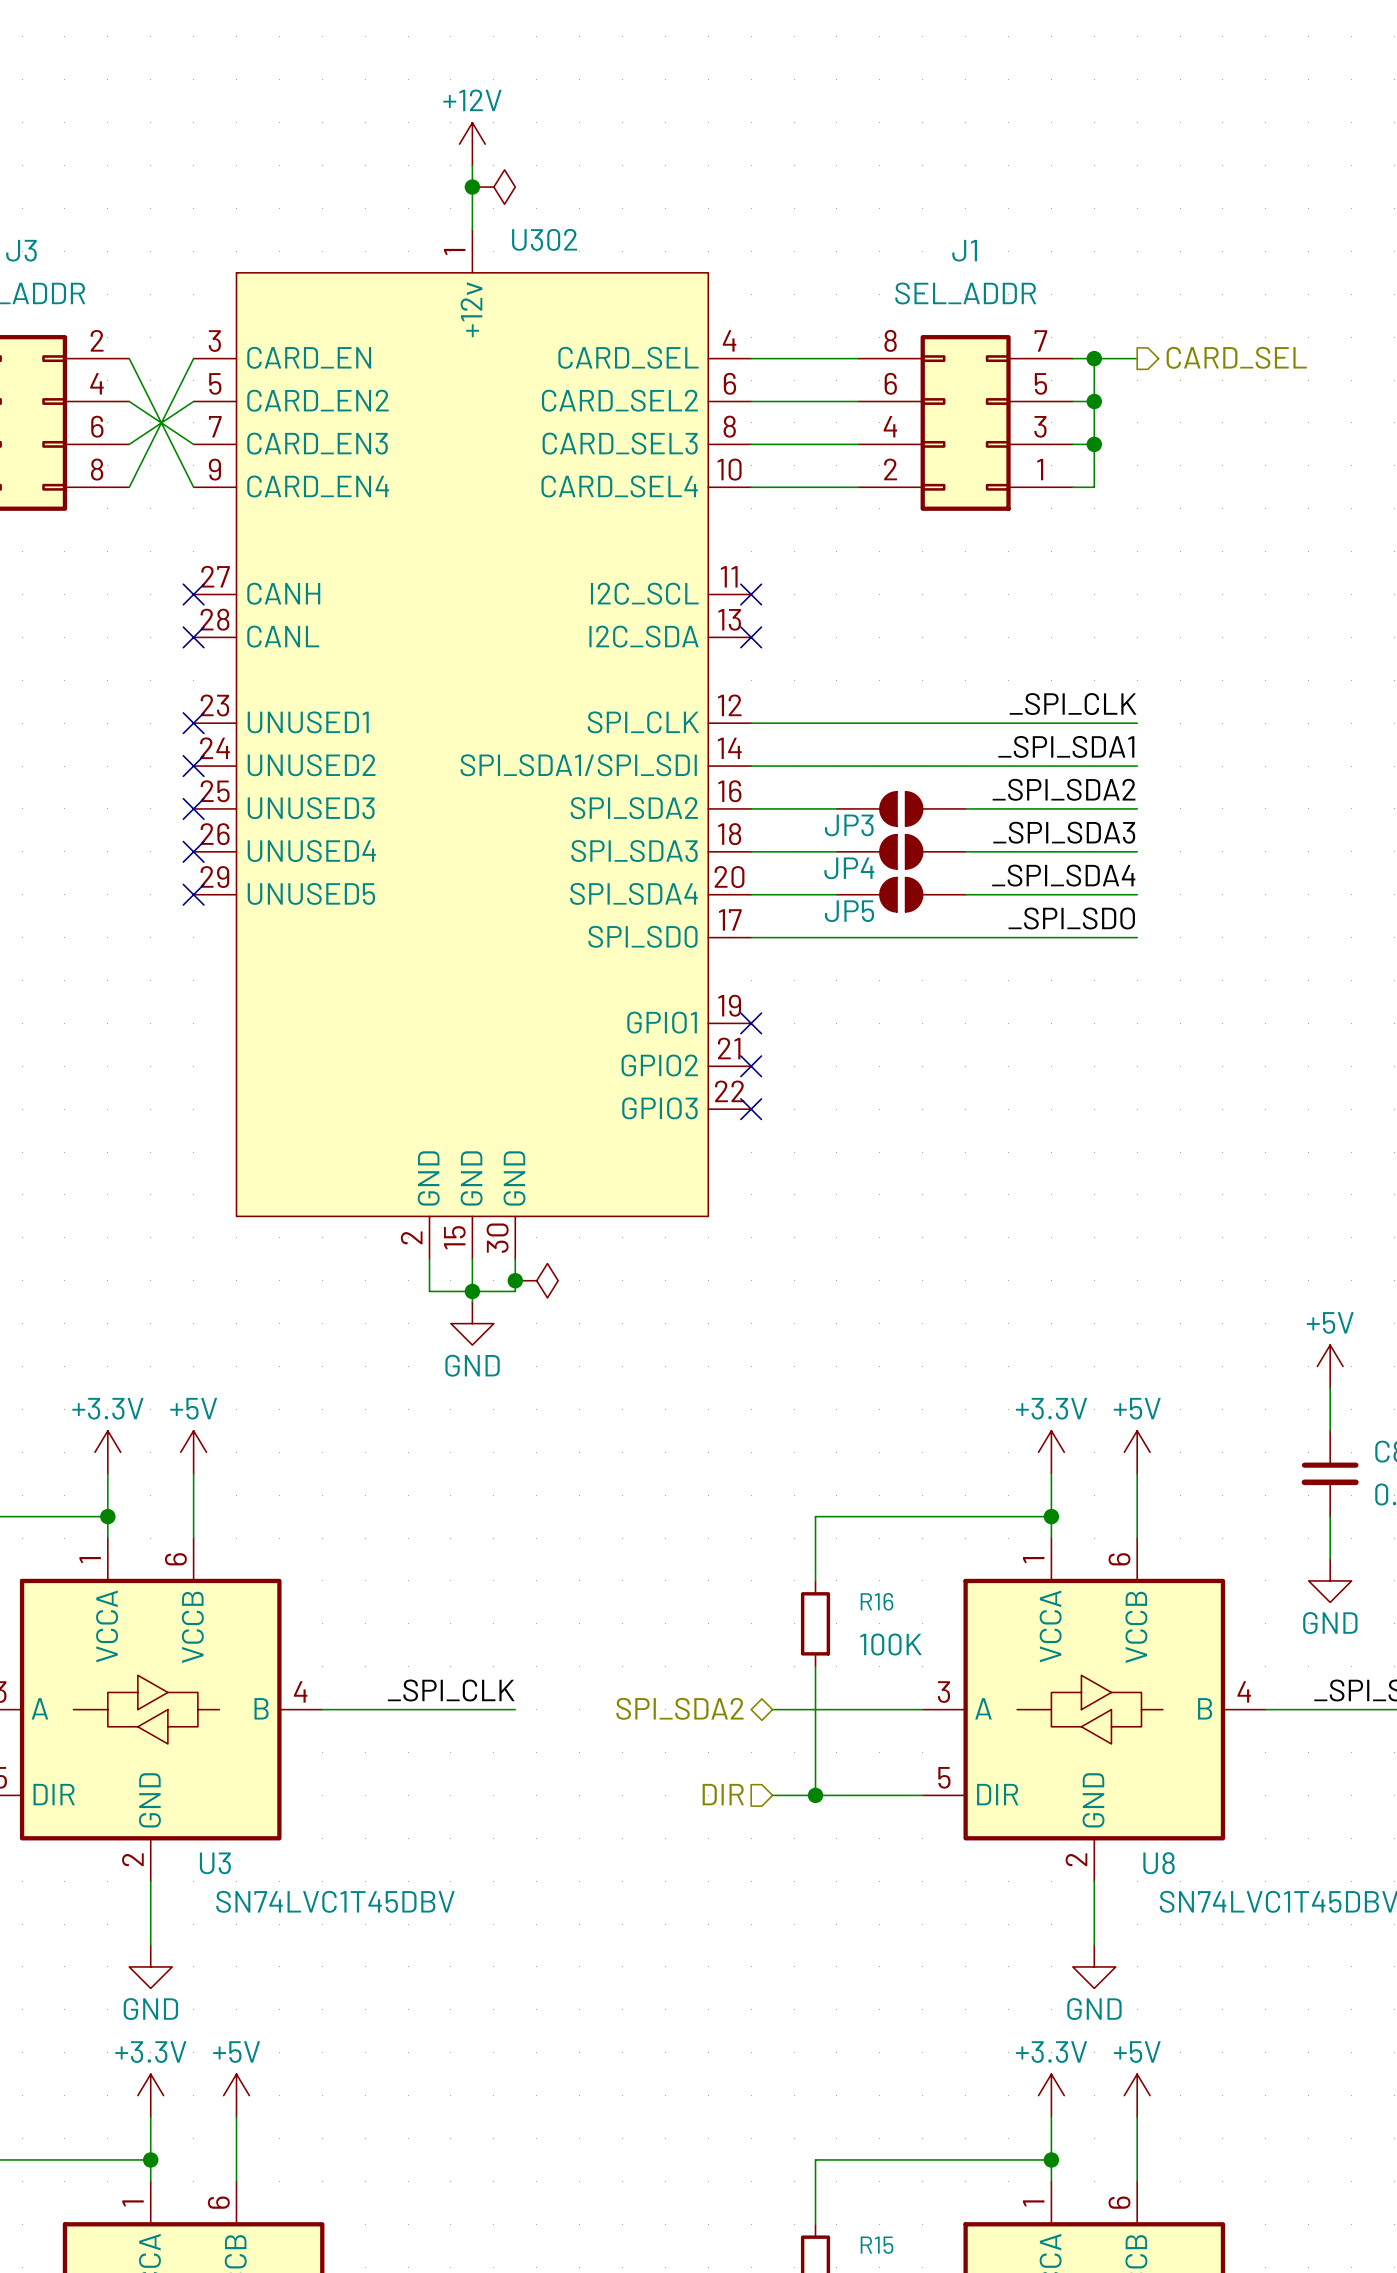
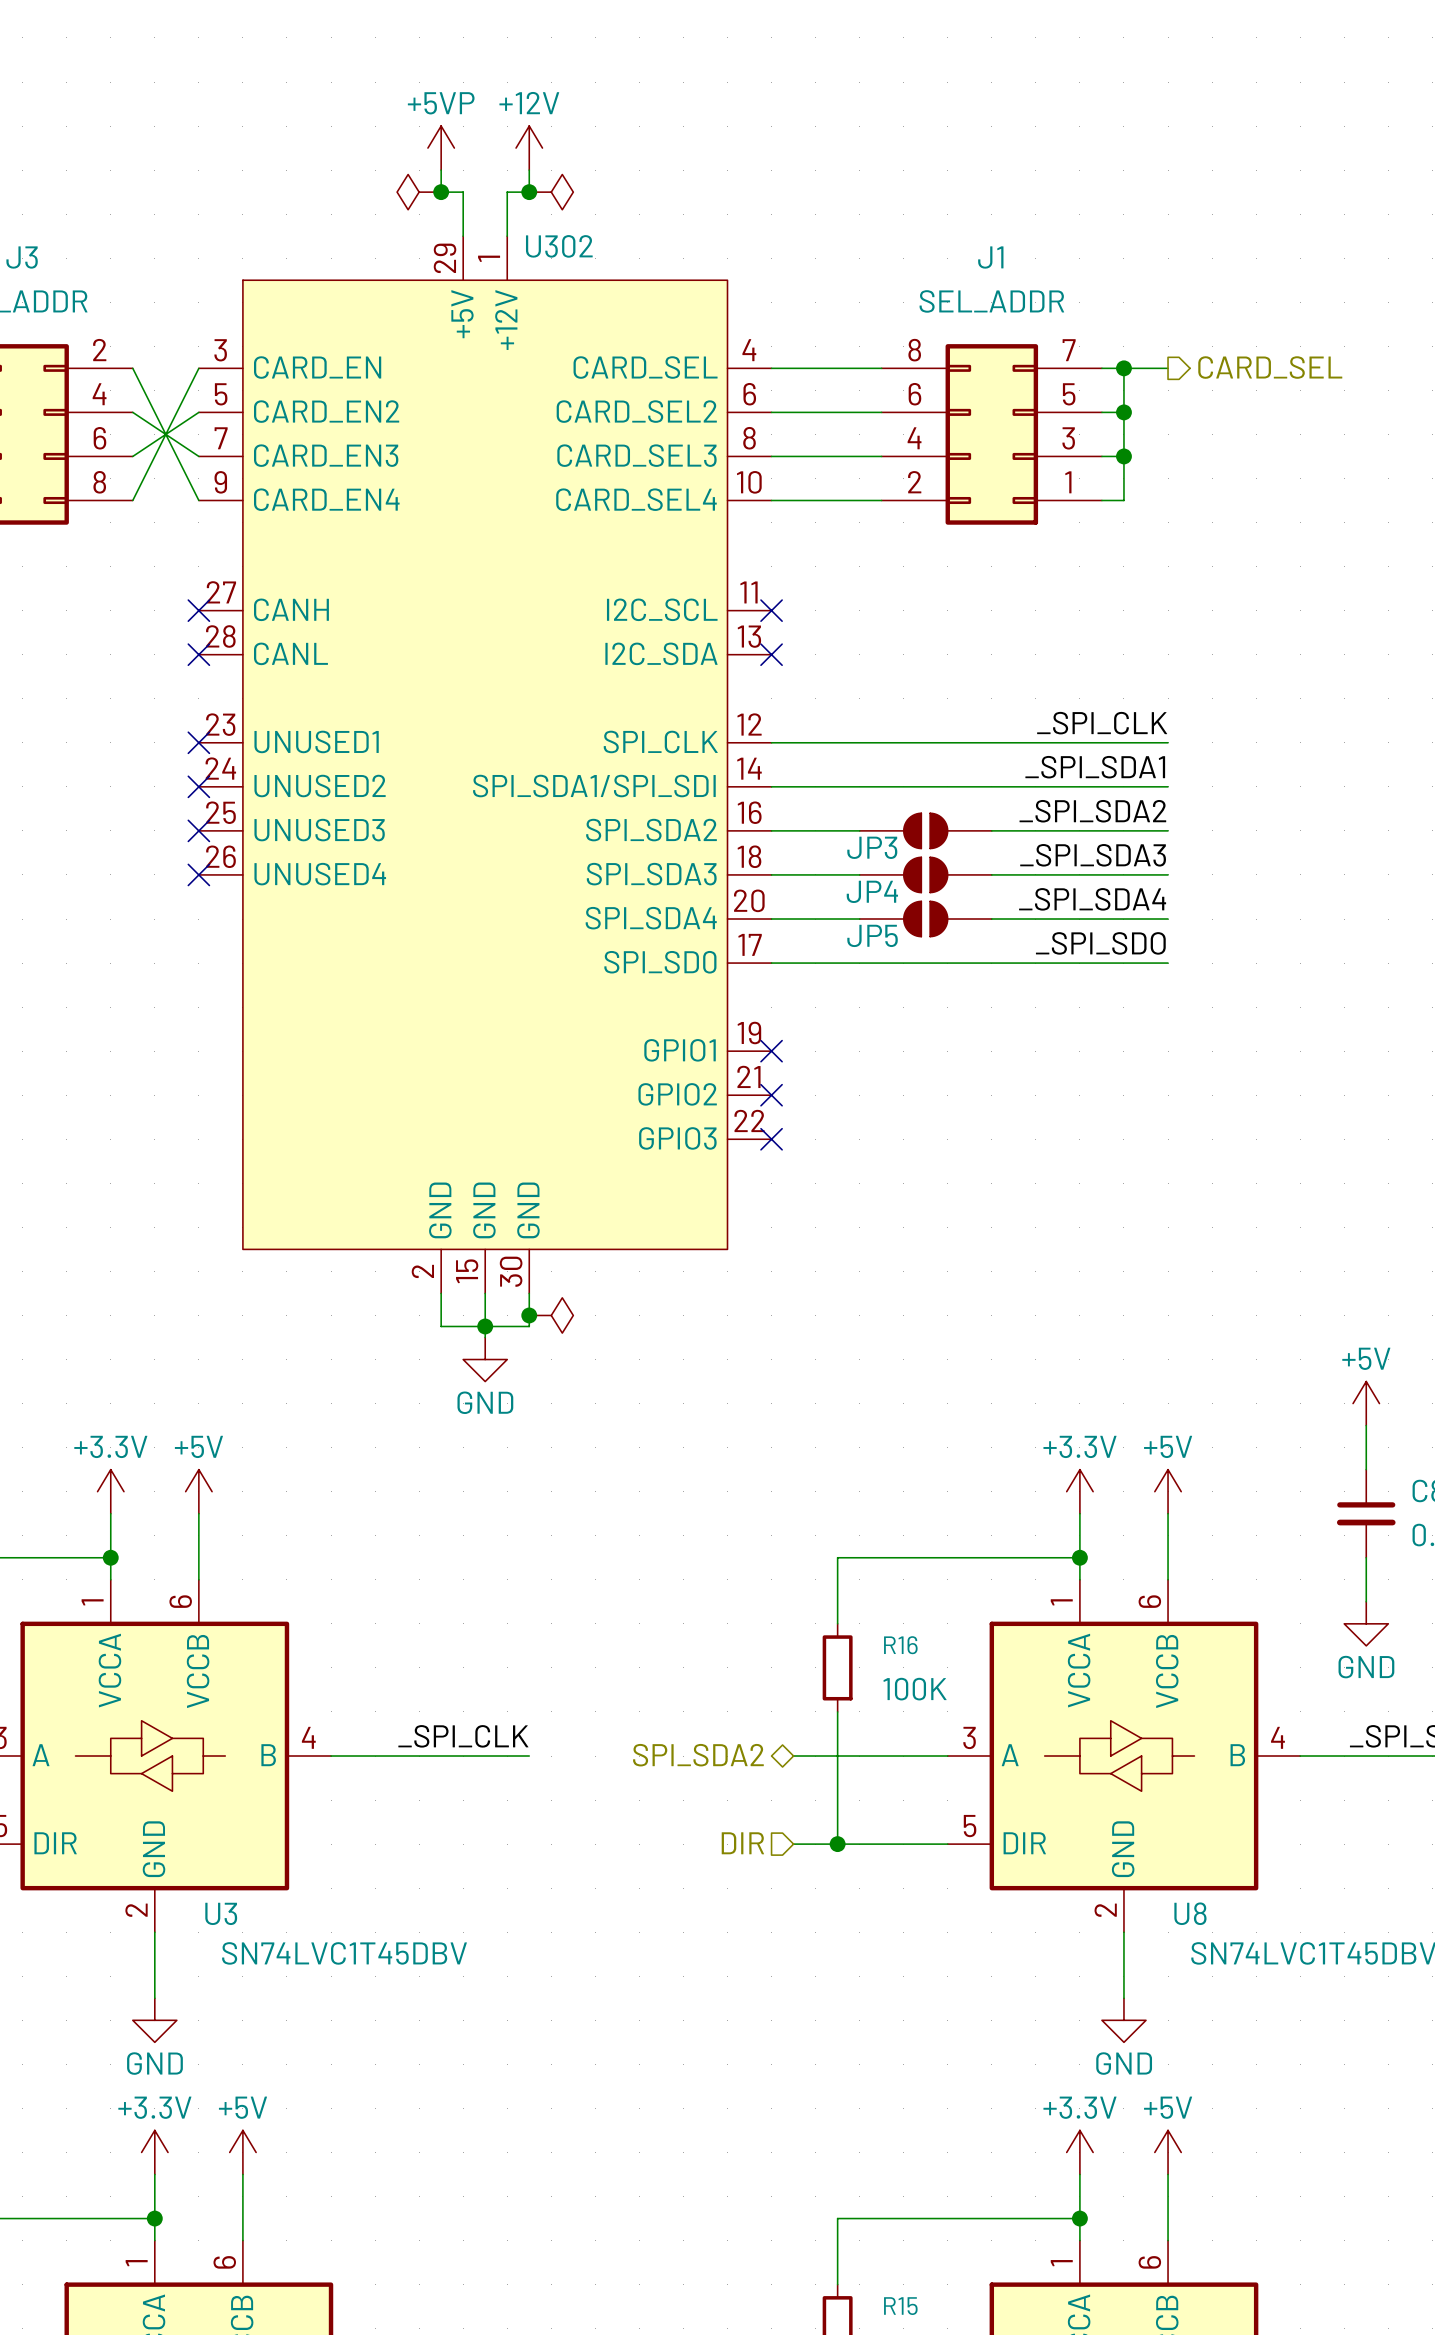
power symbol: none -> +5VP (441, 148)
power symbol position: +12V (472, 144) -> +12V (529, 148)
wire: none -> (441, 170) (441, 192) (463, 192) (463, 236)
wire: (472, 165) (472, 229) -> none
wire: none -> (529, 170) (529, 192) (507, 192) (507, 236)
power symbol: none -> (419, 192)
junction: none -> (441, 192)
junction: (472, 187) -> none
power symbol: (493, 187) -> none
junction: none -> (529, 192)
power symbol: none -> (551, 192)
U302 symbol: [193, 229, 752, 1260] -> [198, 236, 772, 1294]
no-connect mark: (193, 894) -> none

